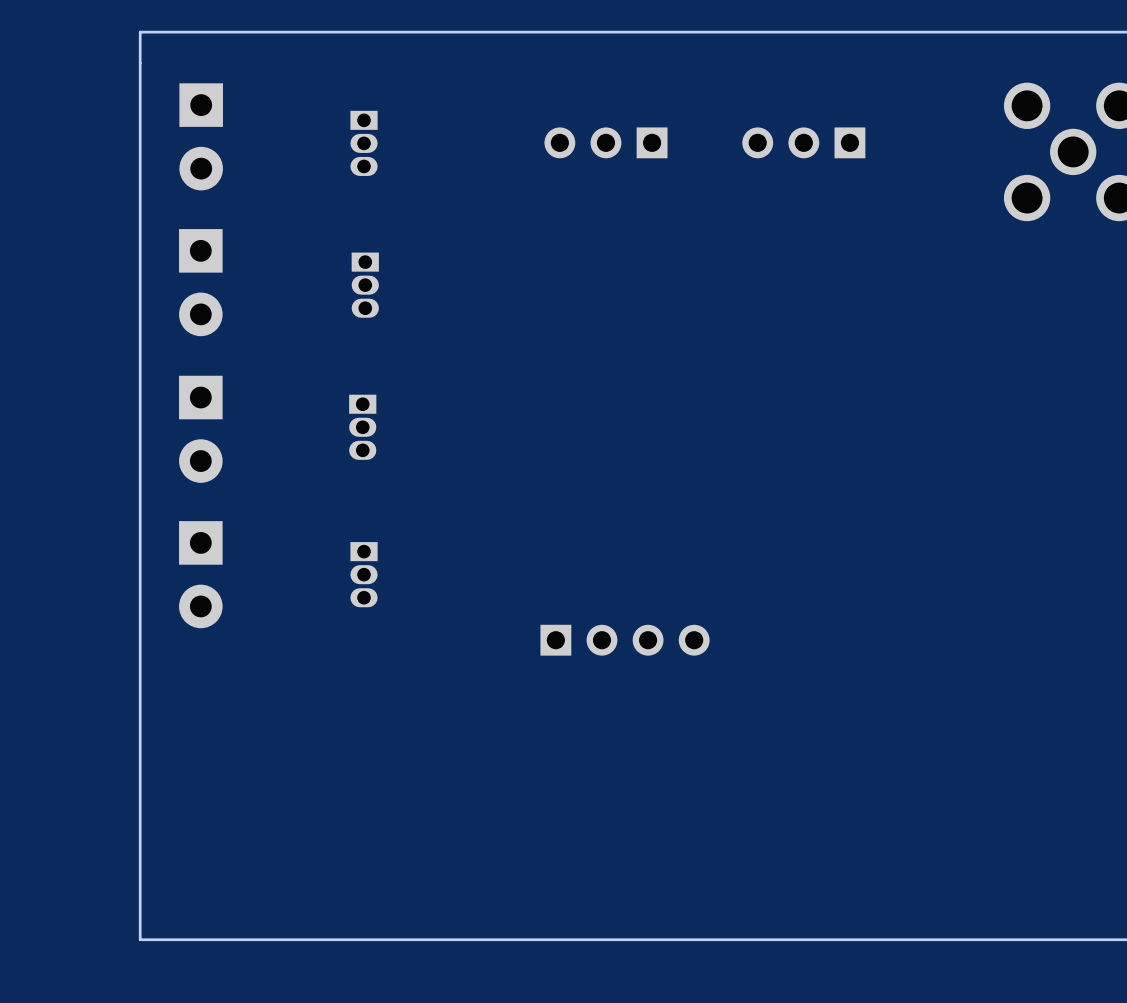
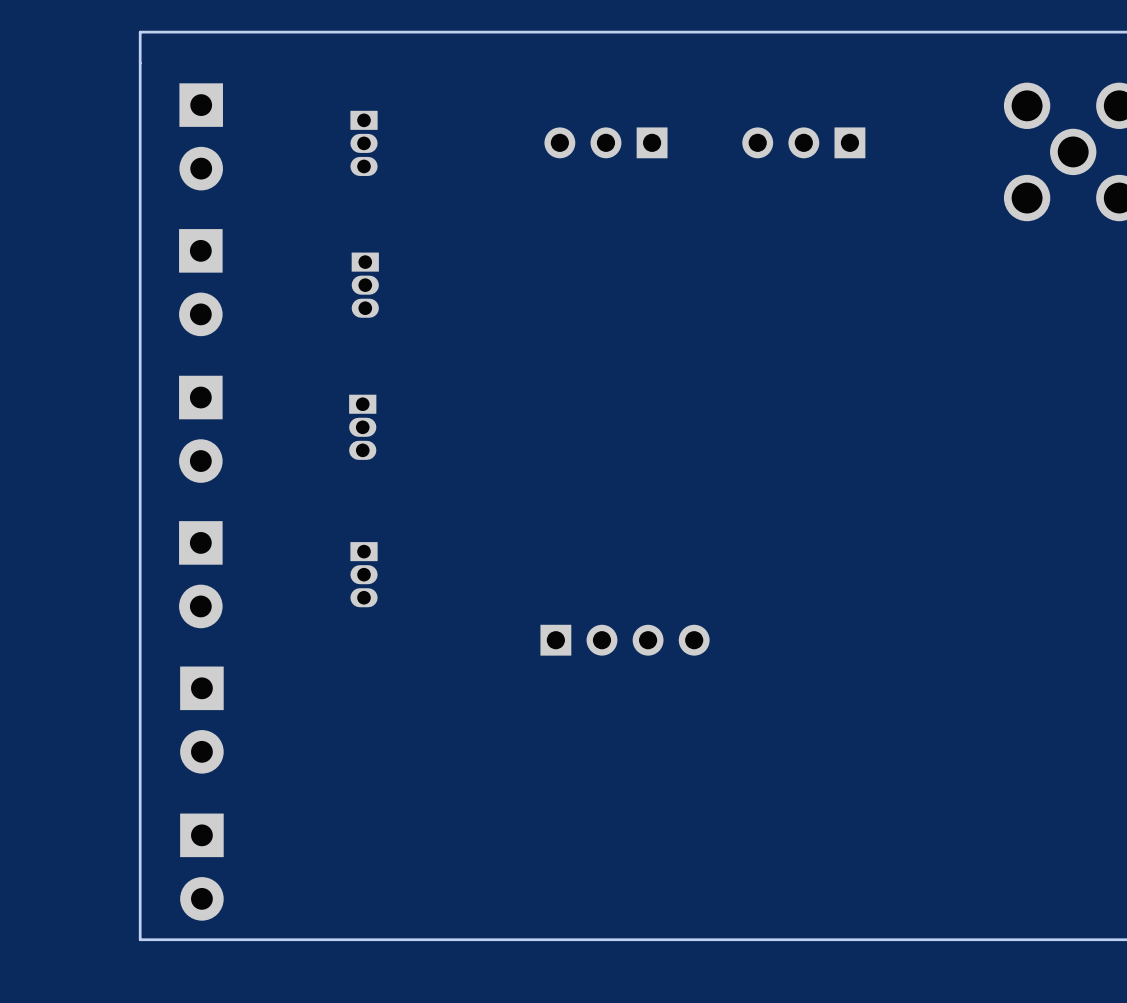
part: none -> (201, 720)
part: none -> (201, 867)

